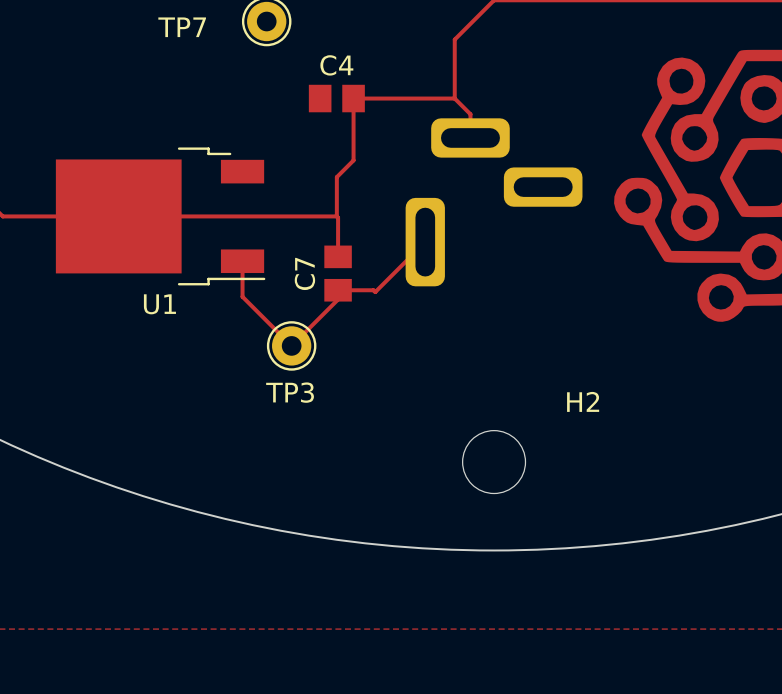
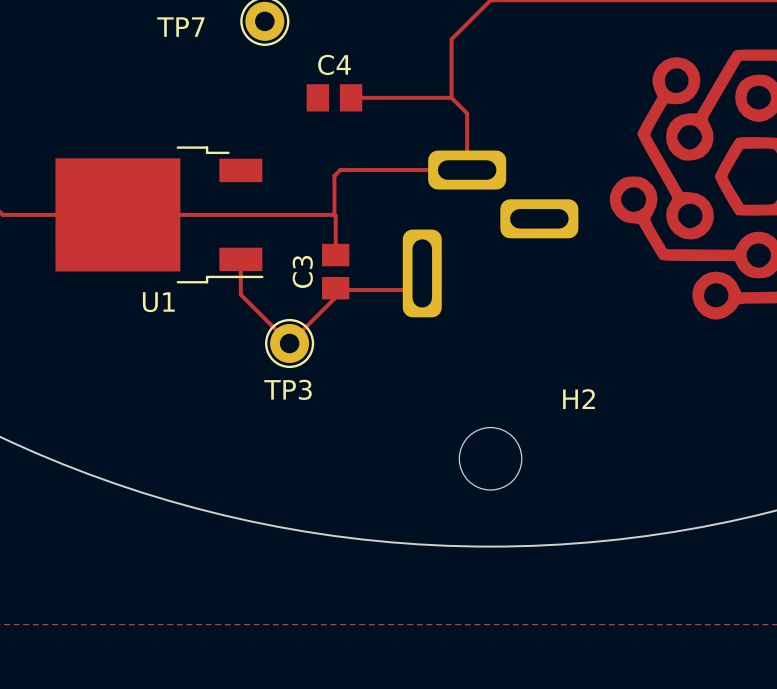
track: (353, 98) (353, 160) (342, 171) -> (467, 137) (467, 170) (340, 170)
part position: (494, 202) -> (490, 233)
track: (425, 242) (375, 292) (373, 290) (338, 290) (336, 300) -> (422, 273) (405, 290) (334, 290) (334, 298)
C7 name: C7 (304, 273) -> C3 (302, 271)

